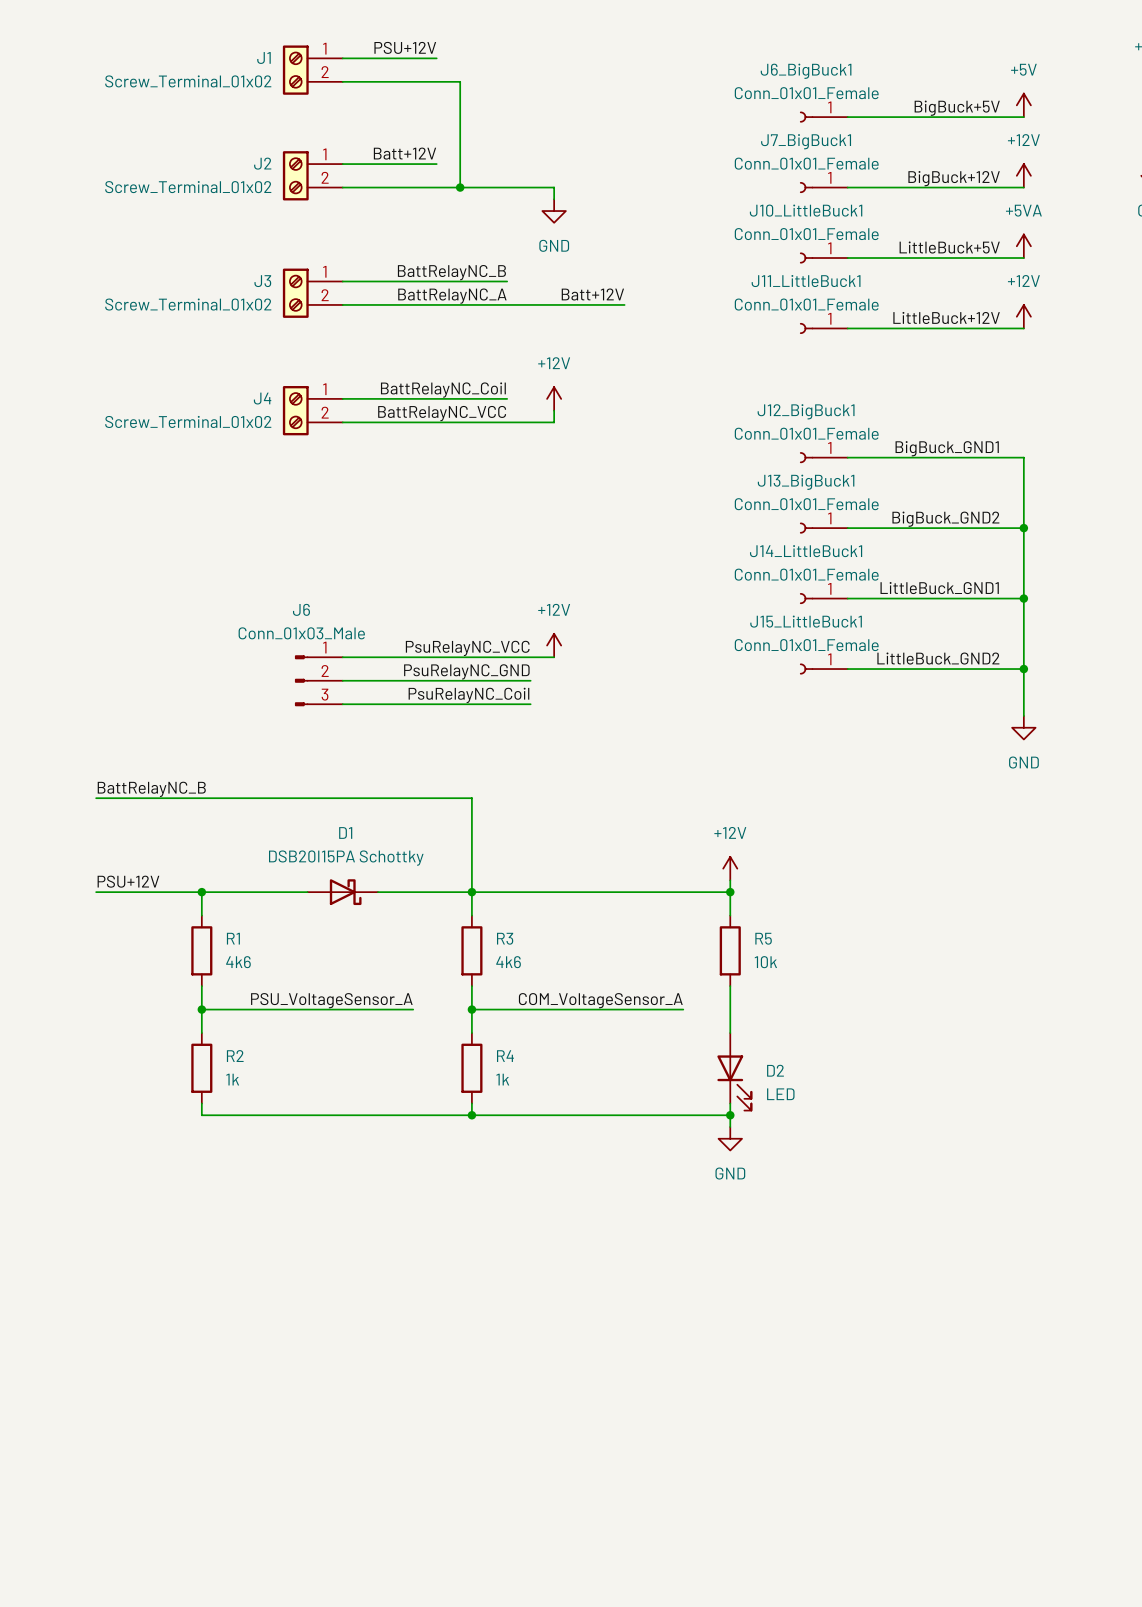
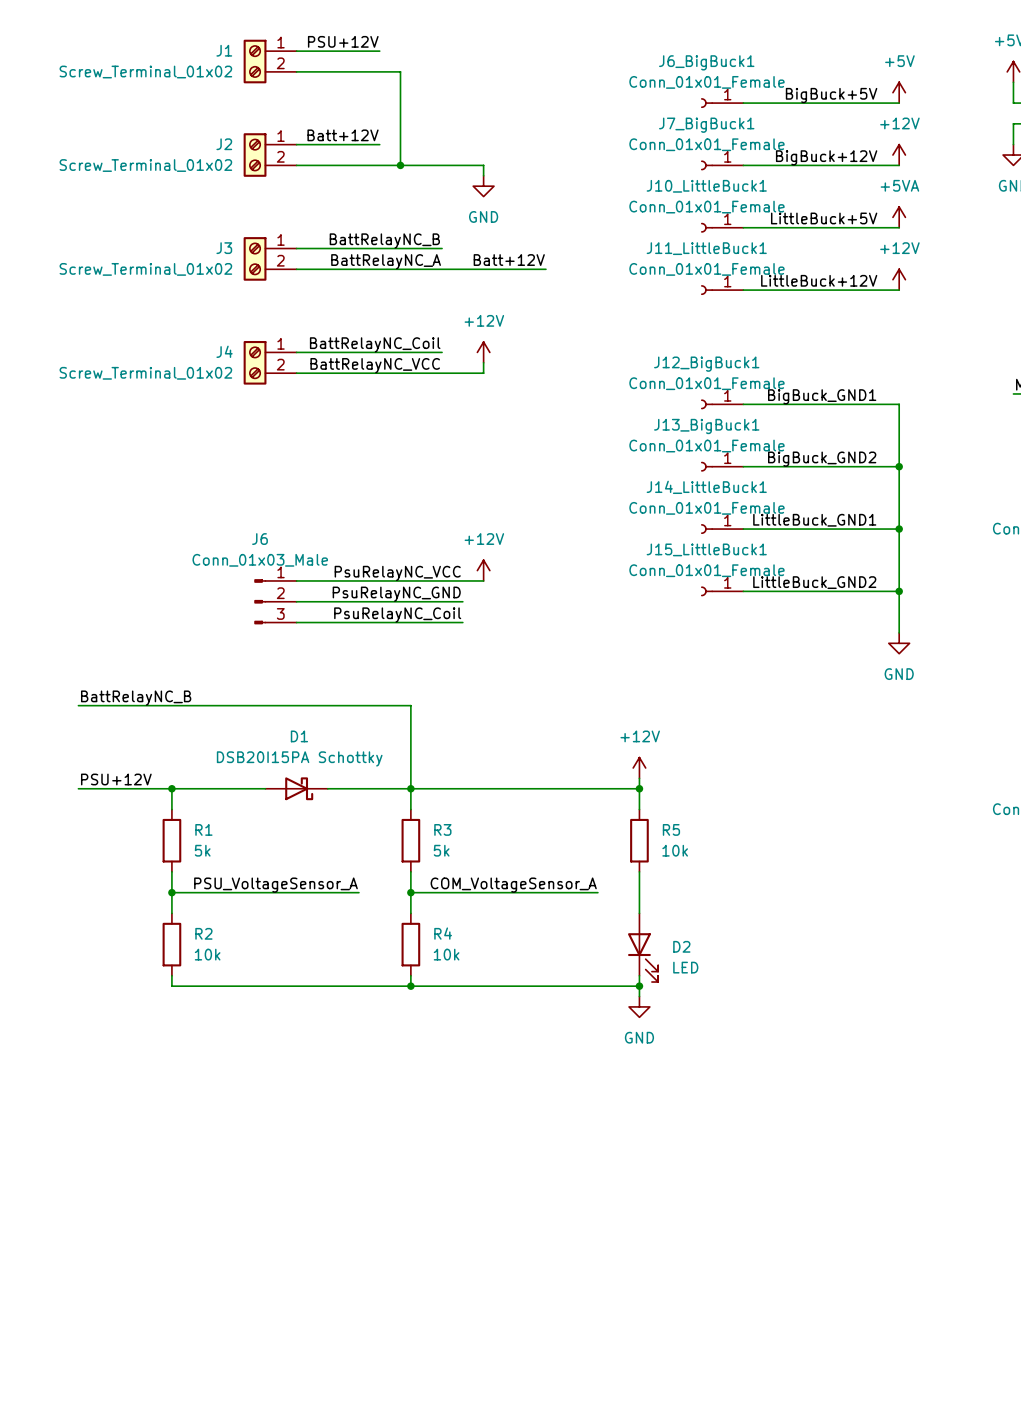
R1 value: 4k6 (238, 962) -> 5k (202, 850)
R3 value: 4k6 (508, 962) -> 5k (441, 850)
R2 value: 1k (232, 1079) -> 10k (207, 954)
R4 value: 1k (502, 1079) -> 10k (446, 954)

